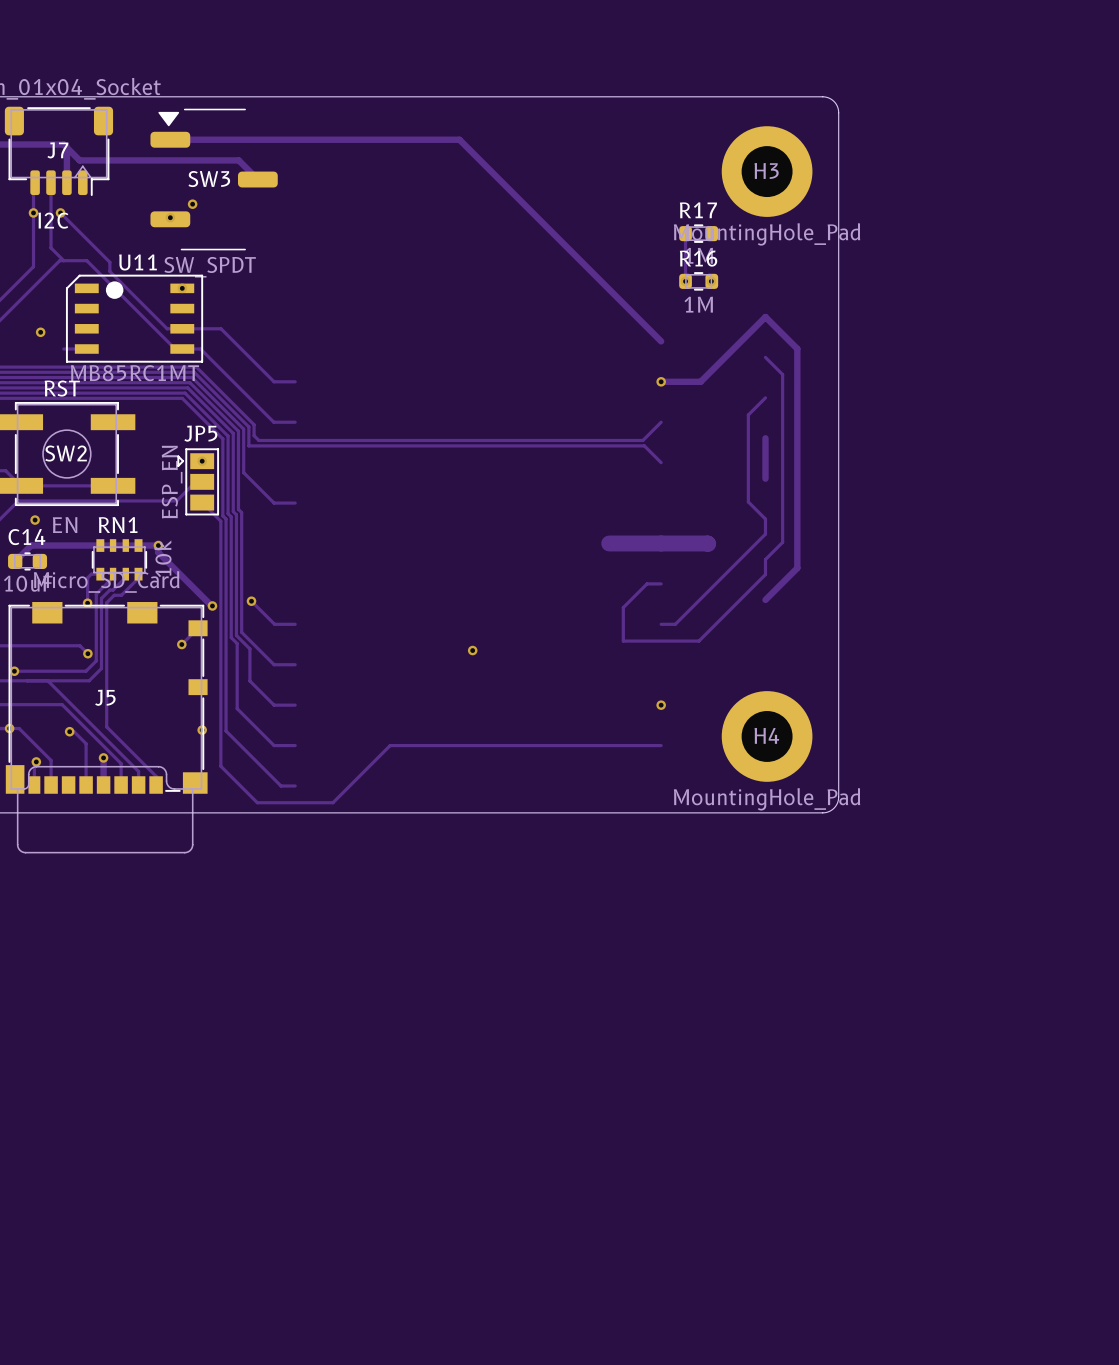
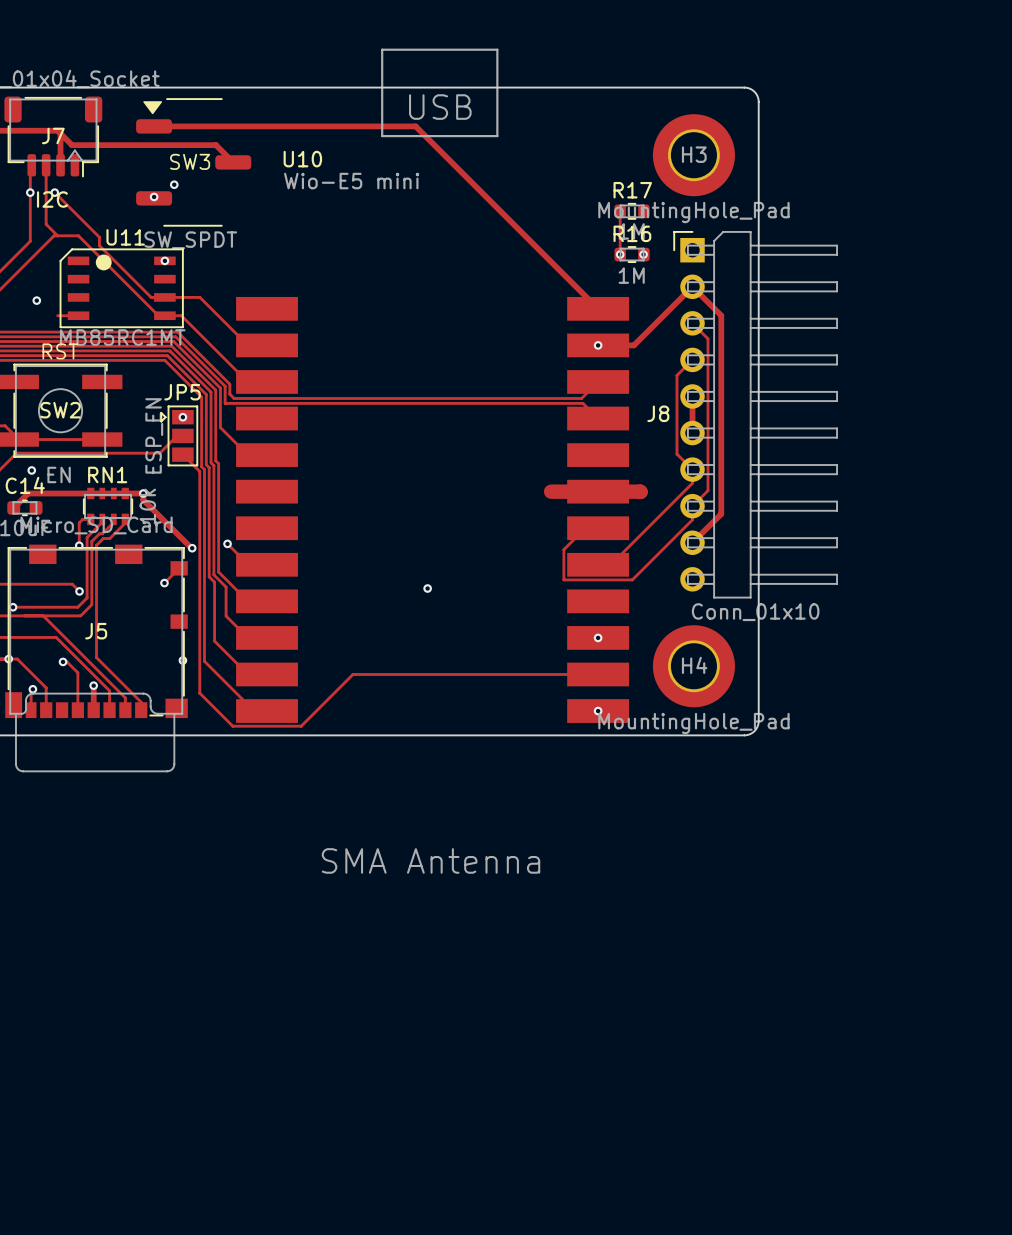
U10: none -> Wio-E5 mini (432, 385)
J8: none -> Conn_01x10 (755, 414)
via: none -> (598, 711)

